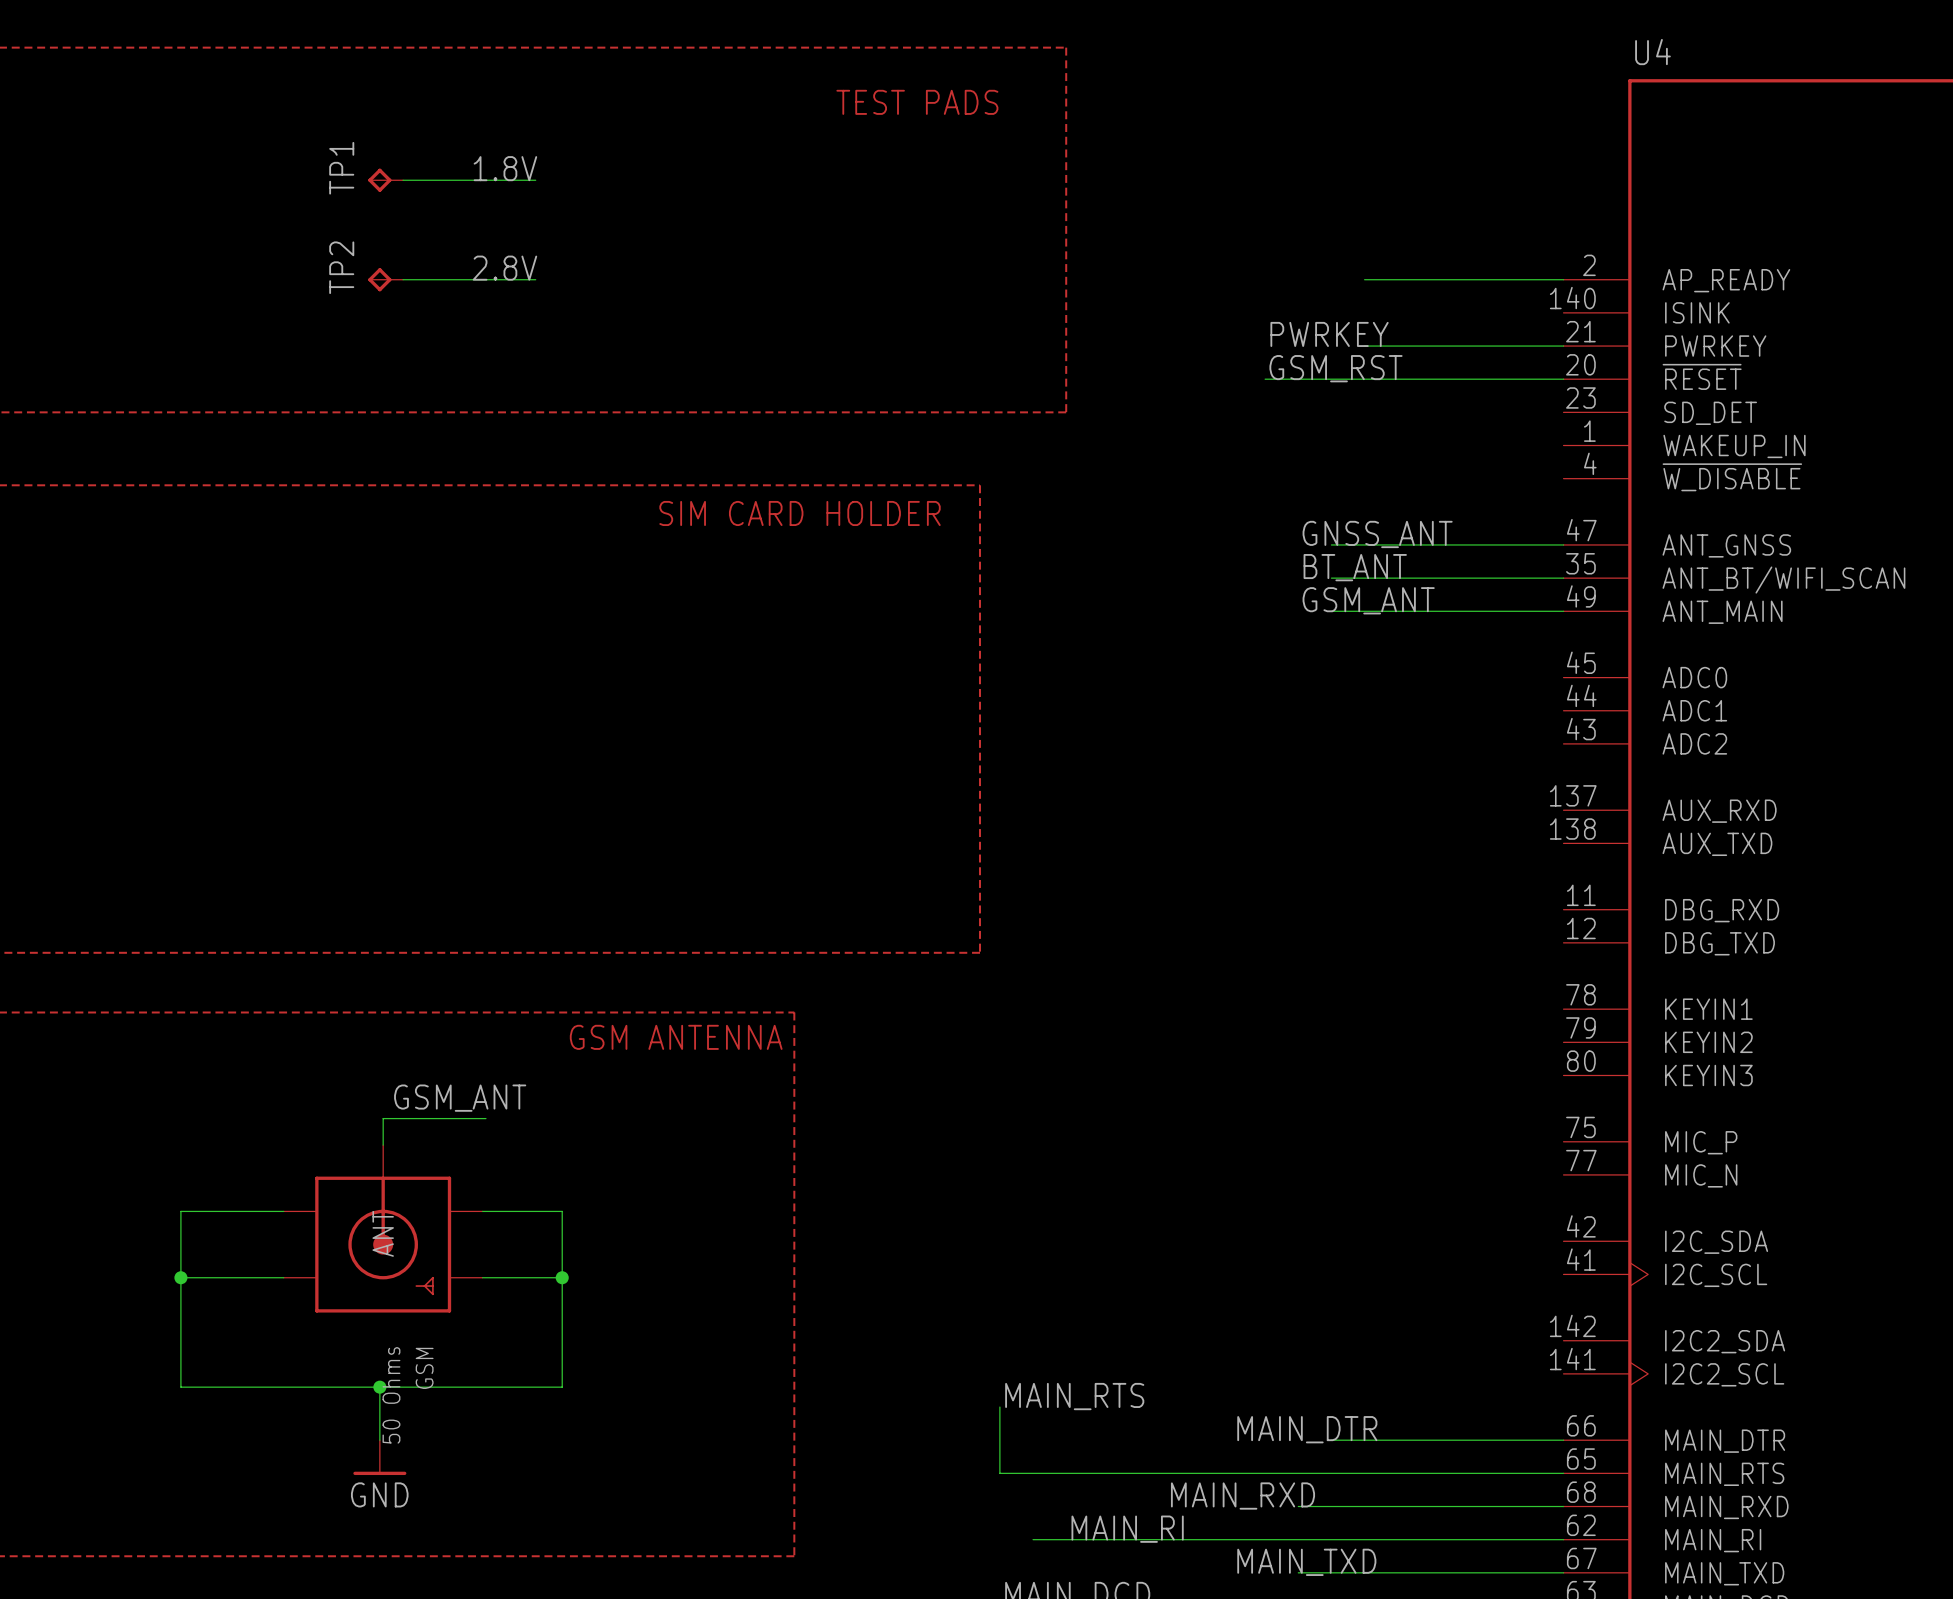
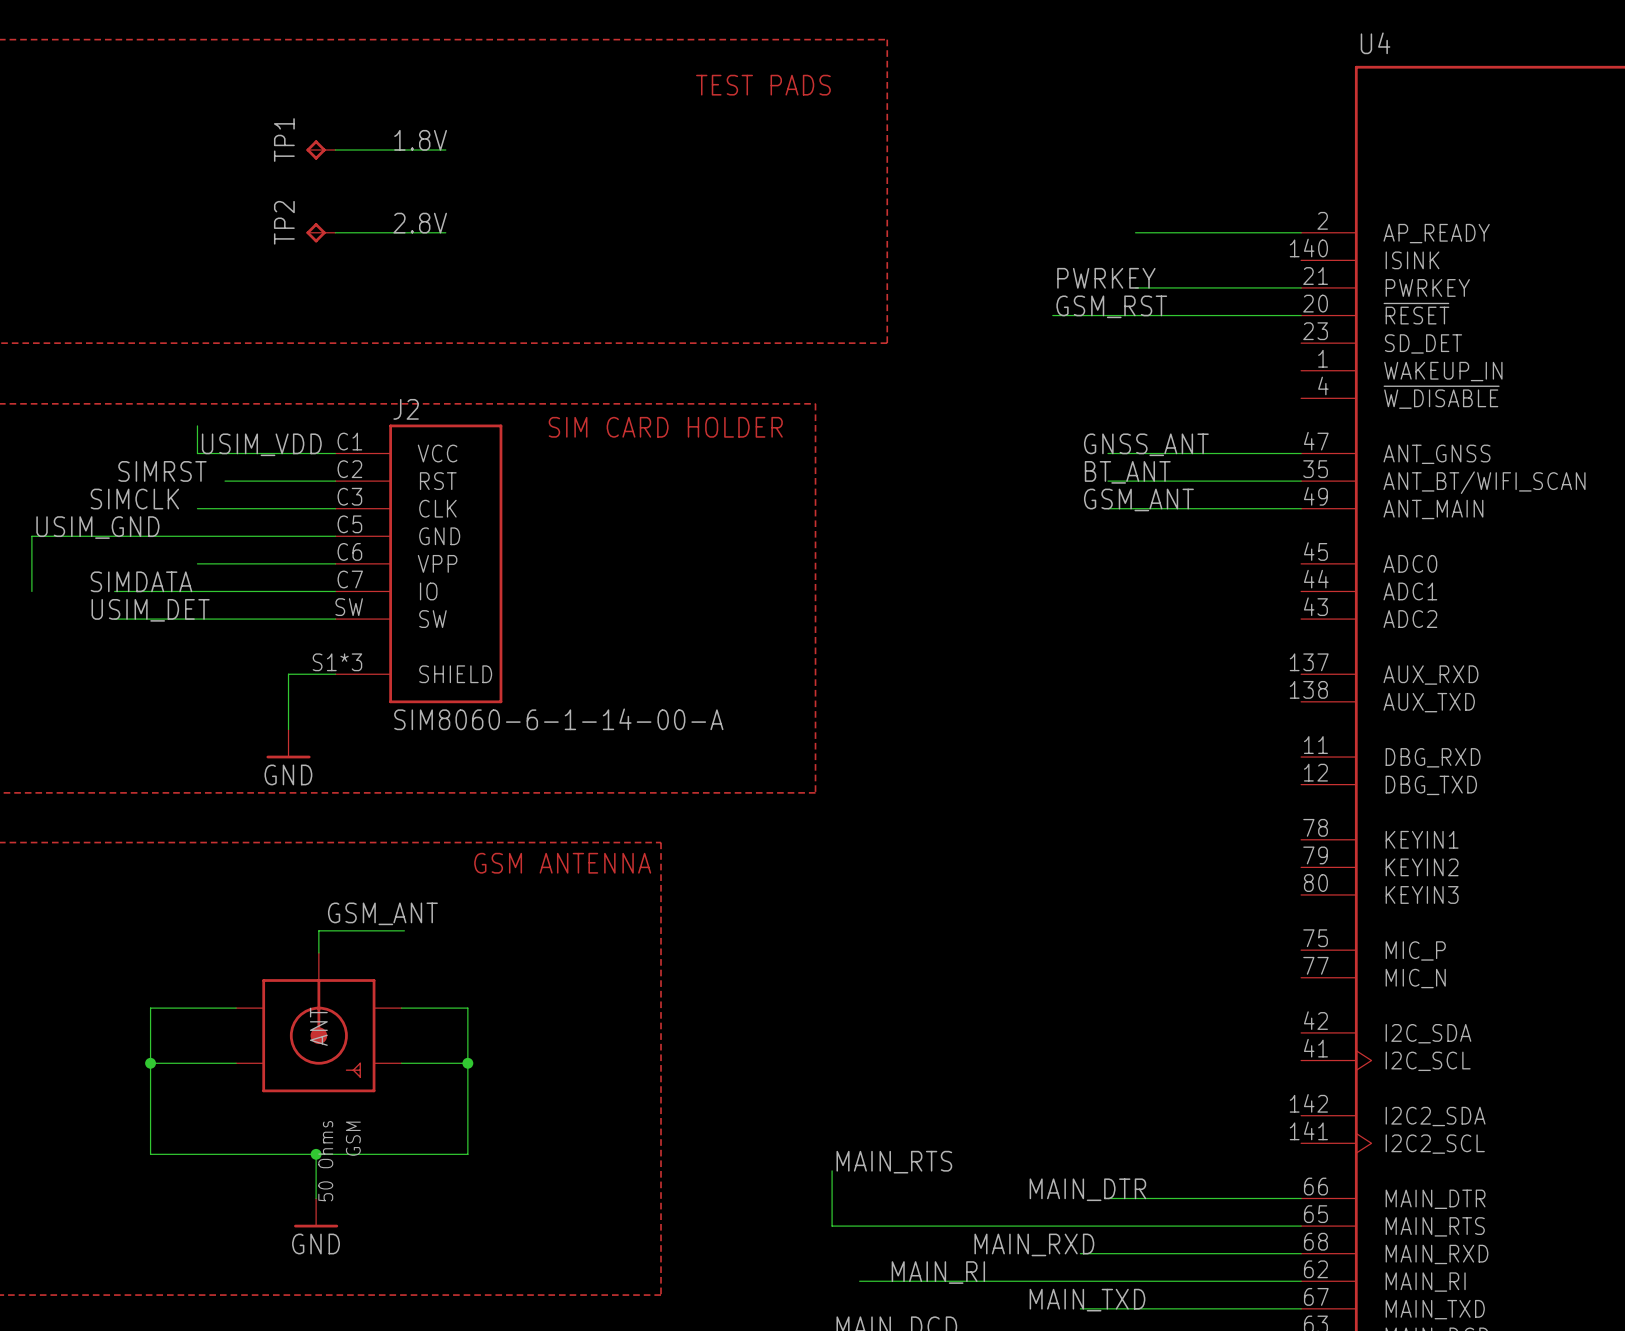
wire: none -> (197, 425) (197, 453) (335, 453)
label: none -> USIM_VDD (261, 444)
label: none -> SIMRST (162, 471)
wire: none -> (225, 481) (335, 481)
label: none -> SIMCLK (134, 499)
wire: none -> (197, 508) (335, 508)
label: none -> USIM_GND (97, 527)
wire: none -> (335, 536) (31, 536) (31, 591)
wire: none -> (197, 563) (335, 563)
J2: none -> SIM8060-6-1-14-00-A (418, 563)
label: none -> SIMDATA (141, 581)
wire: none -> (114, 591) (335, 591)
label: none -> USIM_DET (150, 610)
wire: none -> (114, 619) (335, 619)
wire: none -> (335, 674) (288, 674) (288, 729)
power symbol: none -> GND (288, 743)

